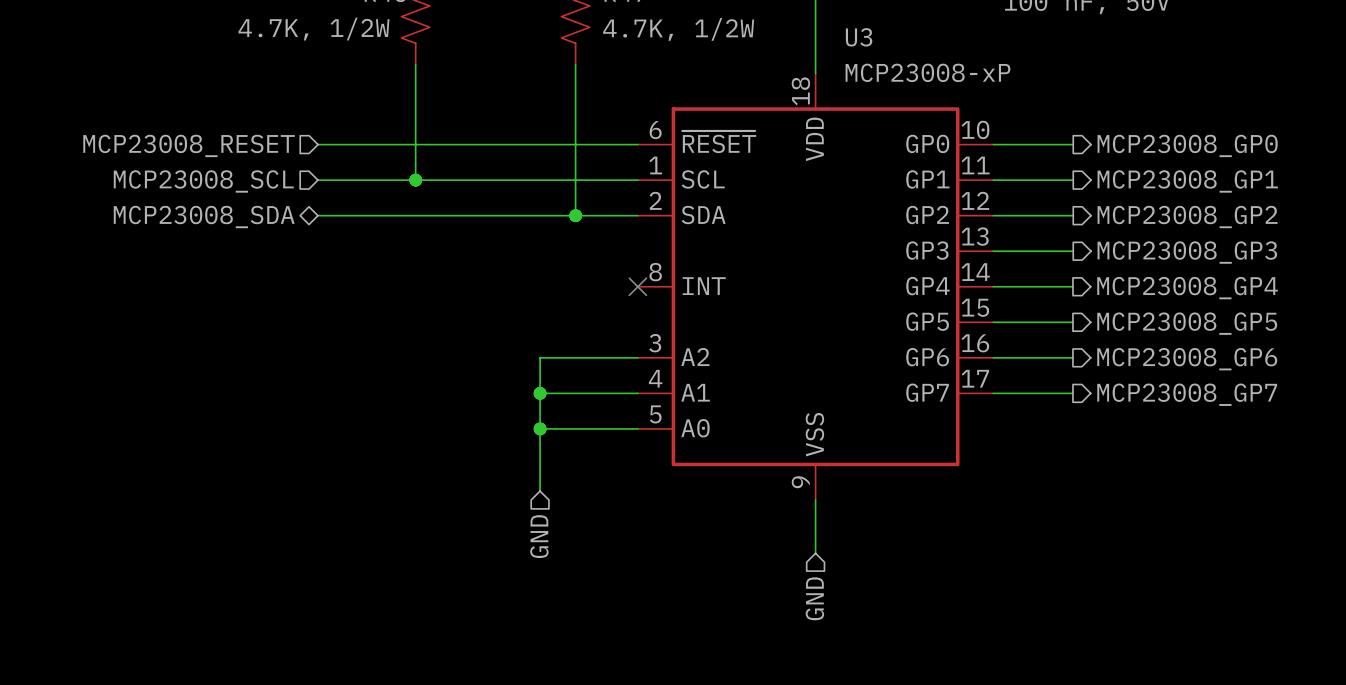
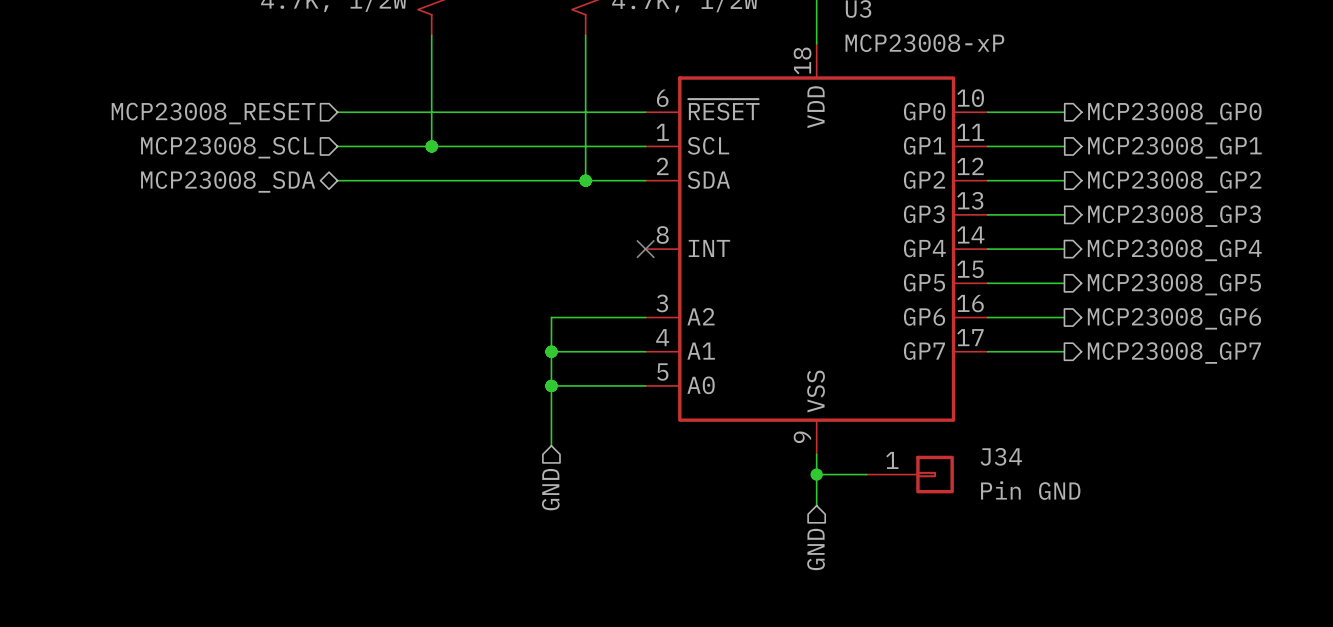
wire: none -> (816, 474) (866, 474)
junction: none -> (816, 474)
J34: none -> Pin GND (910, 474)

